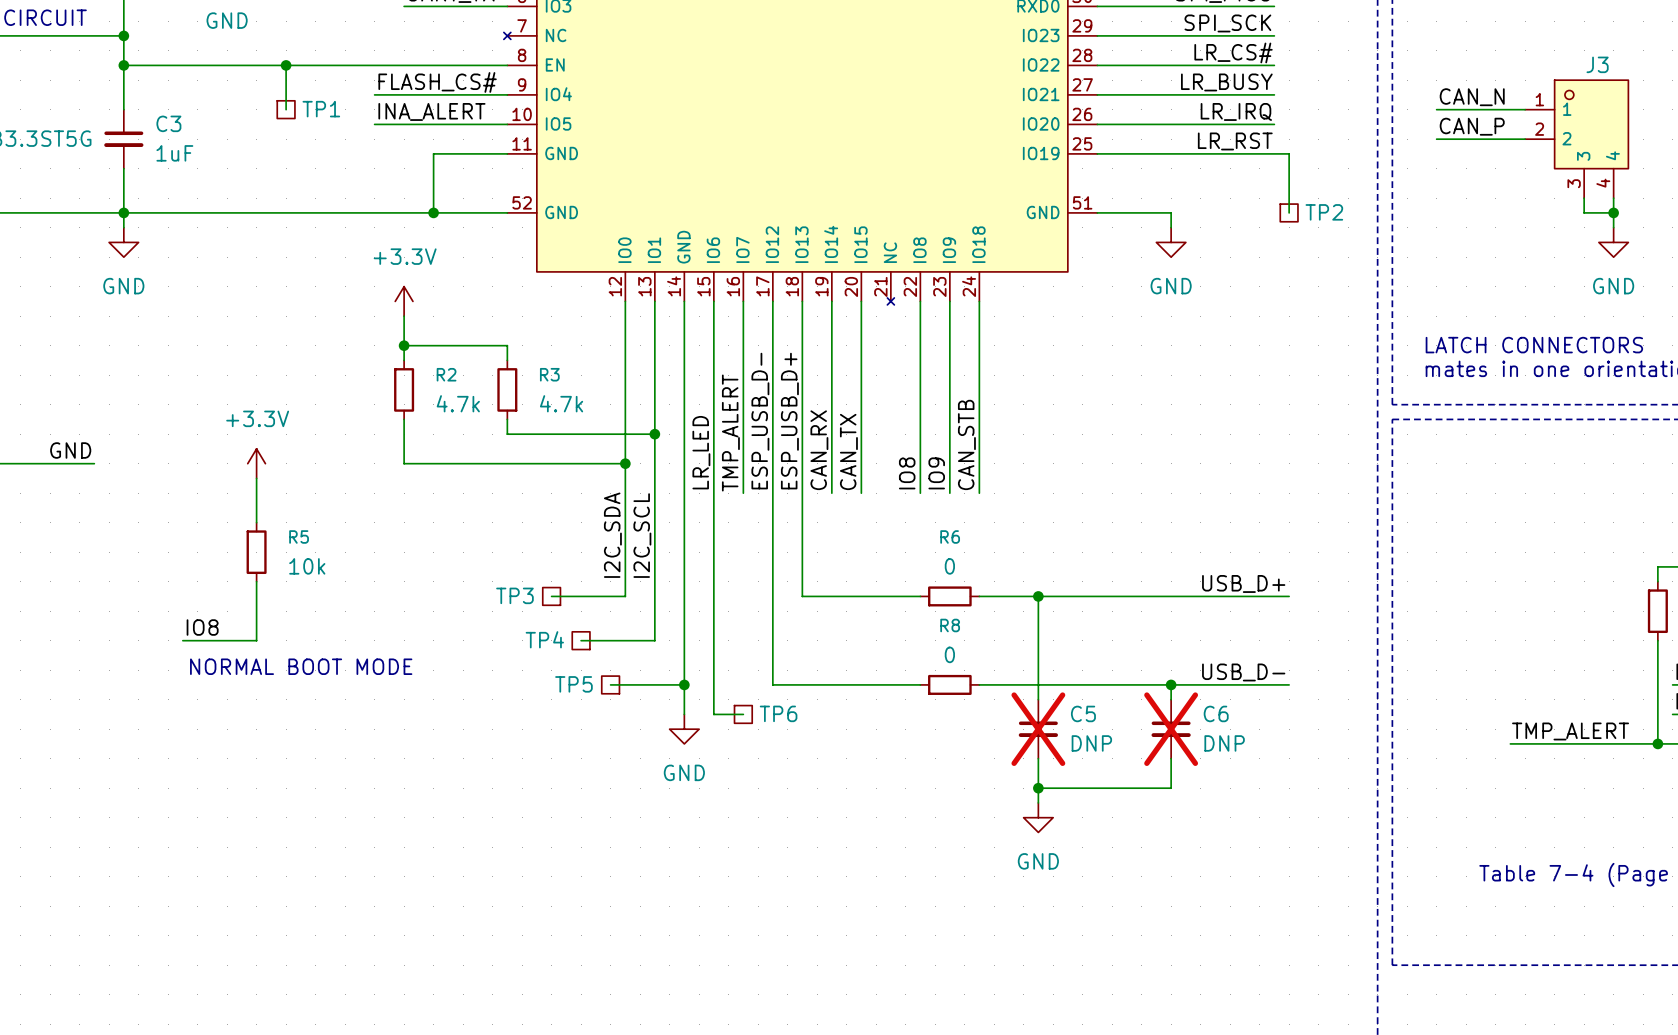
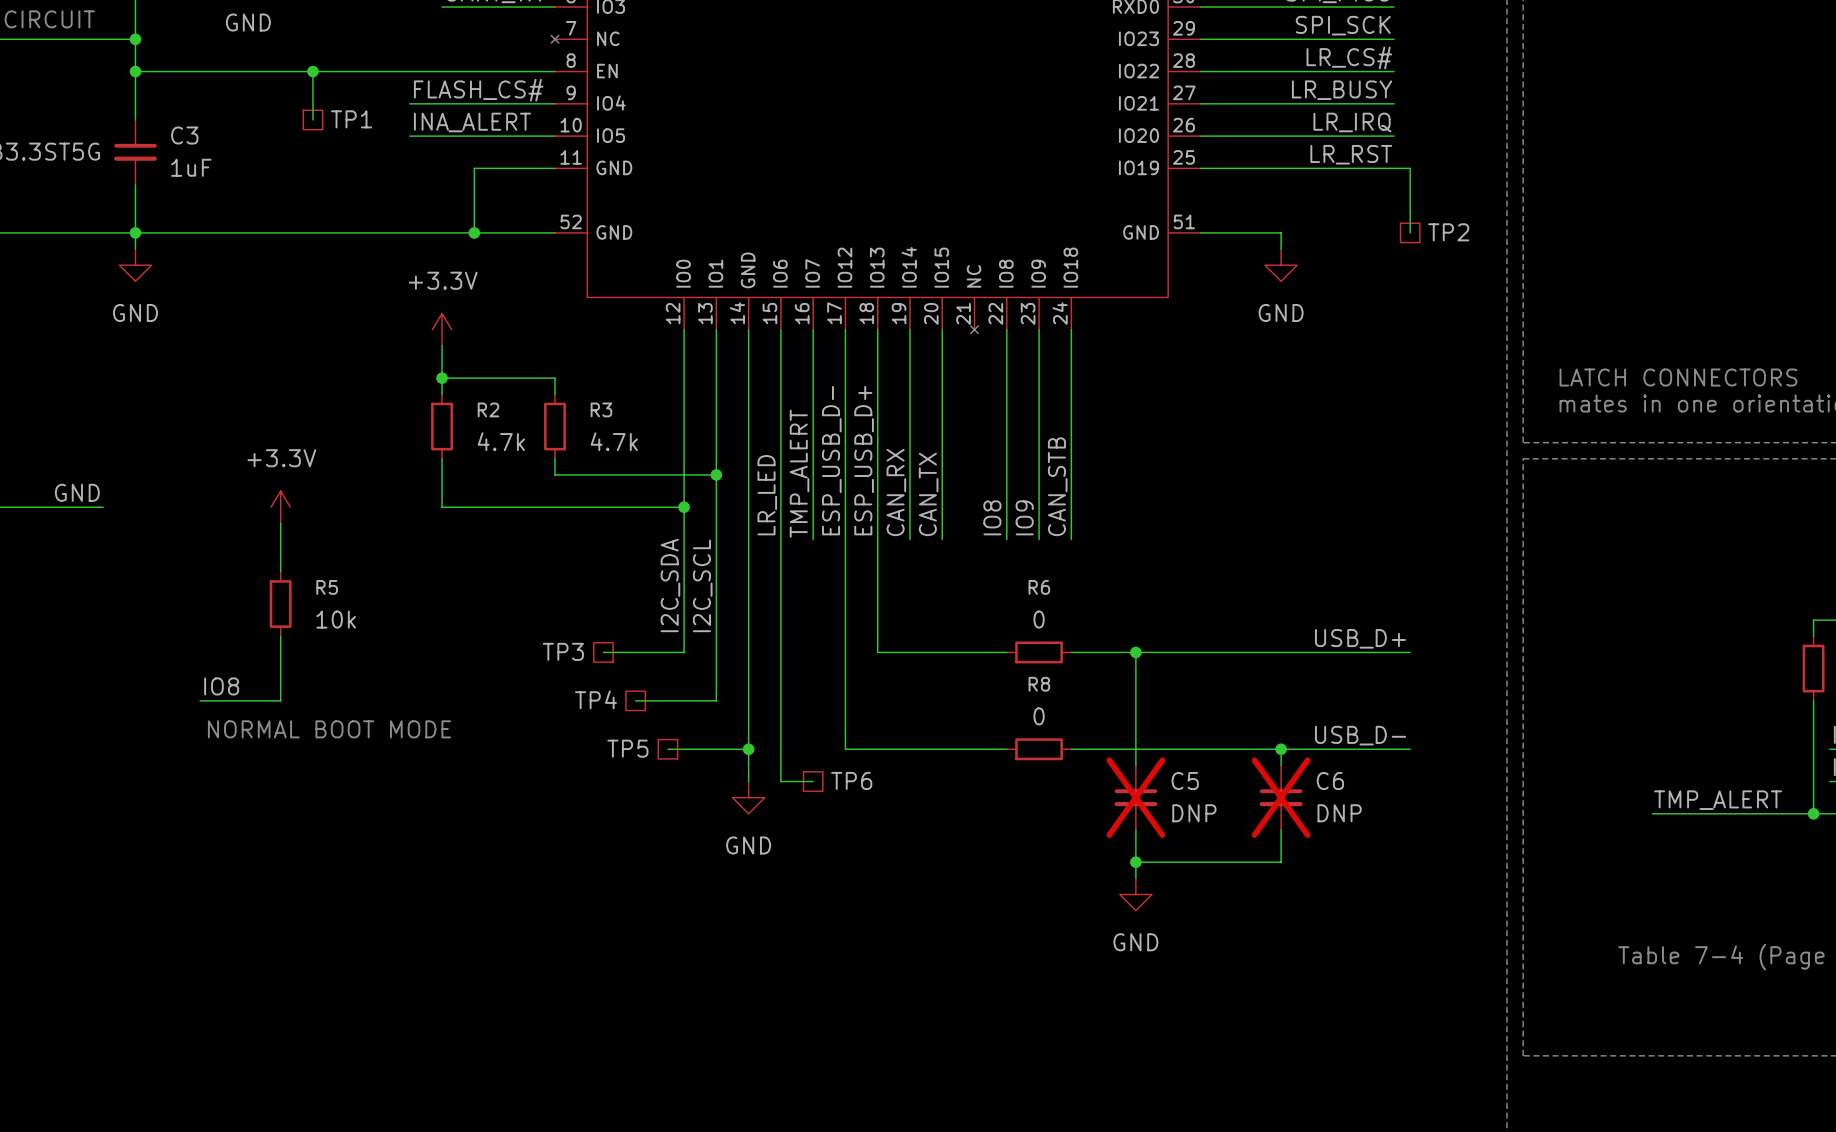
label: CAN_N (1472, 97) -> none
wire: (1436, 109) (1525, 109) -> none
label: CAN_P (1472, 126) -> none
wire: (1436, 139) (1525, 139) -> none
J3: (1576, 139) -> none
wire: (1584, 198) (1584, 212) (1613, 212) -> none
wire: (1613, 198) (1613, 227) -> none
junction: (1613, 212) -> none
power symbol: GND (1613, 242) -> none

